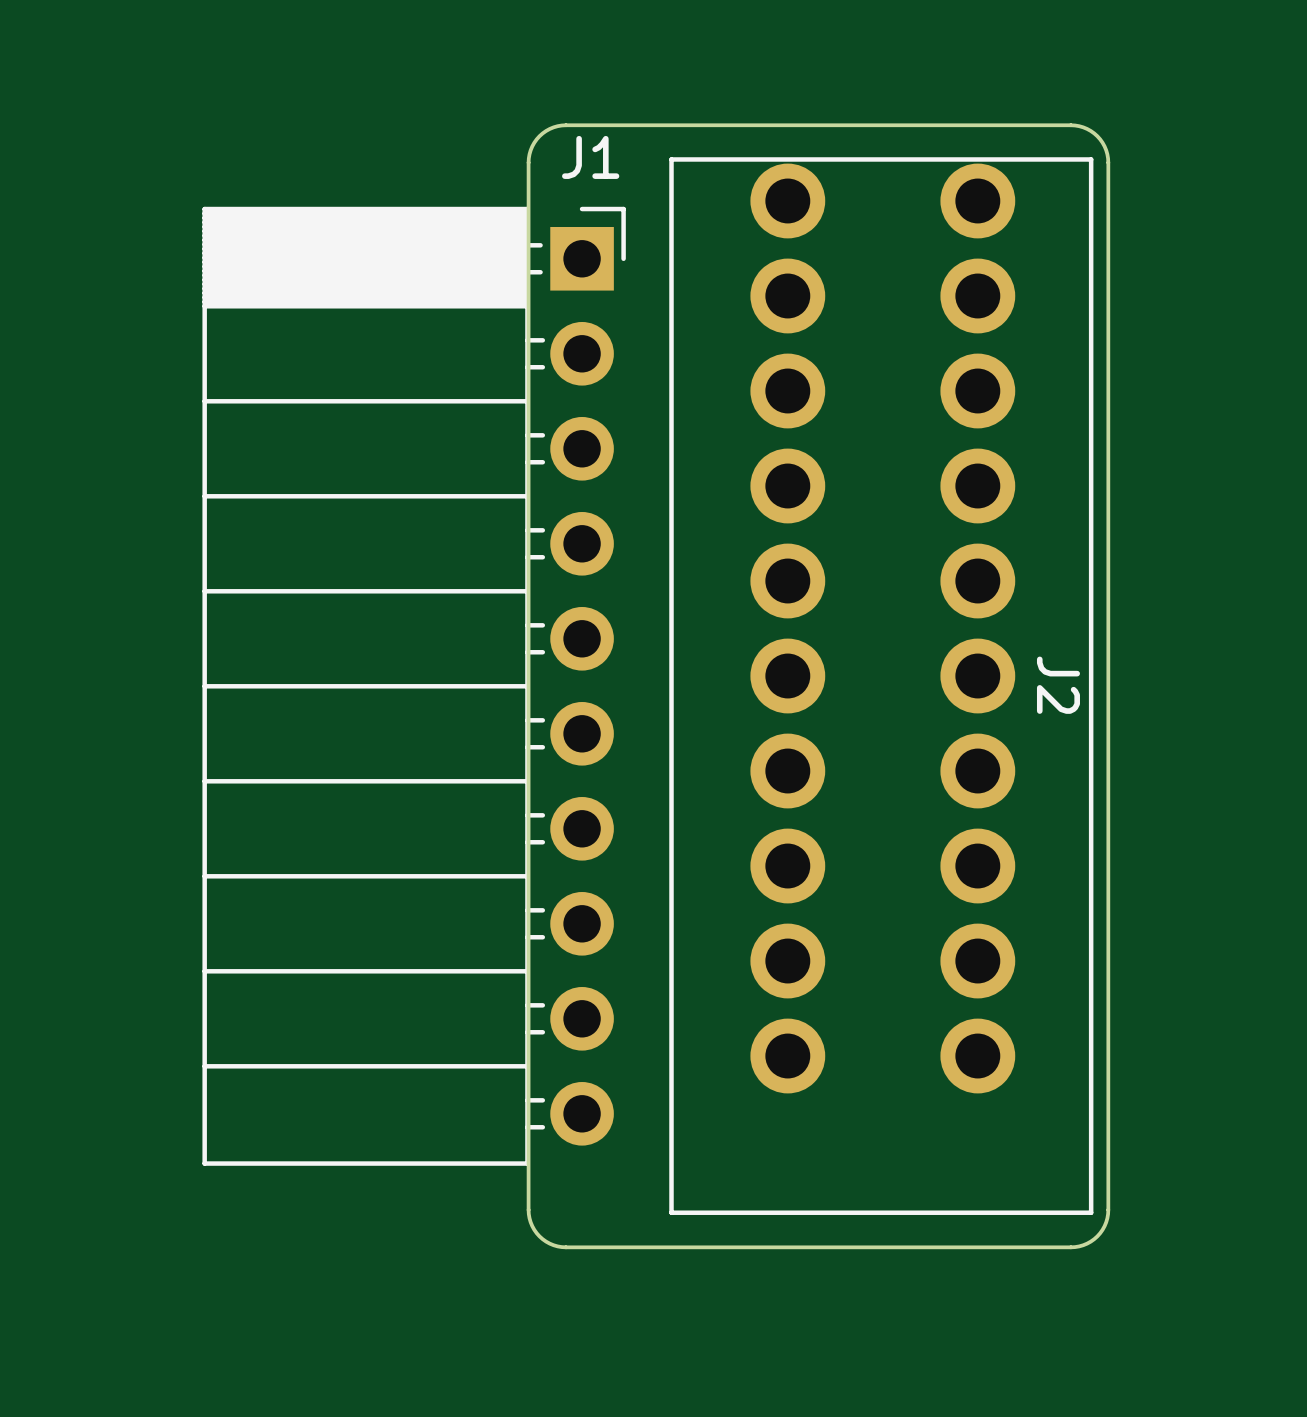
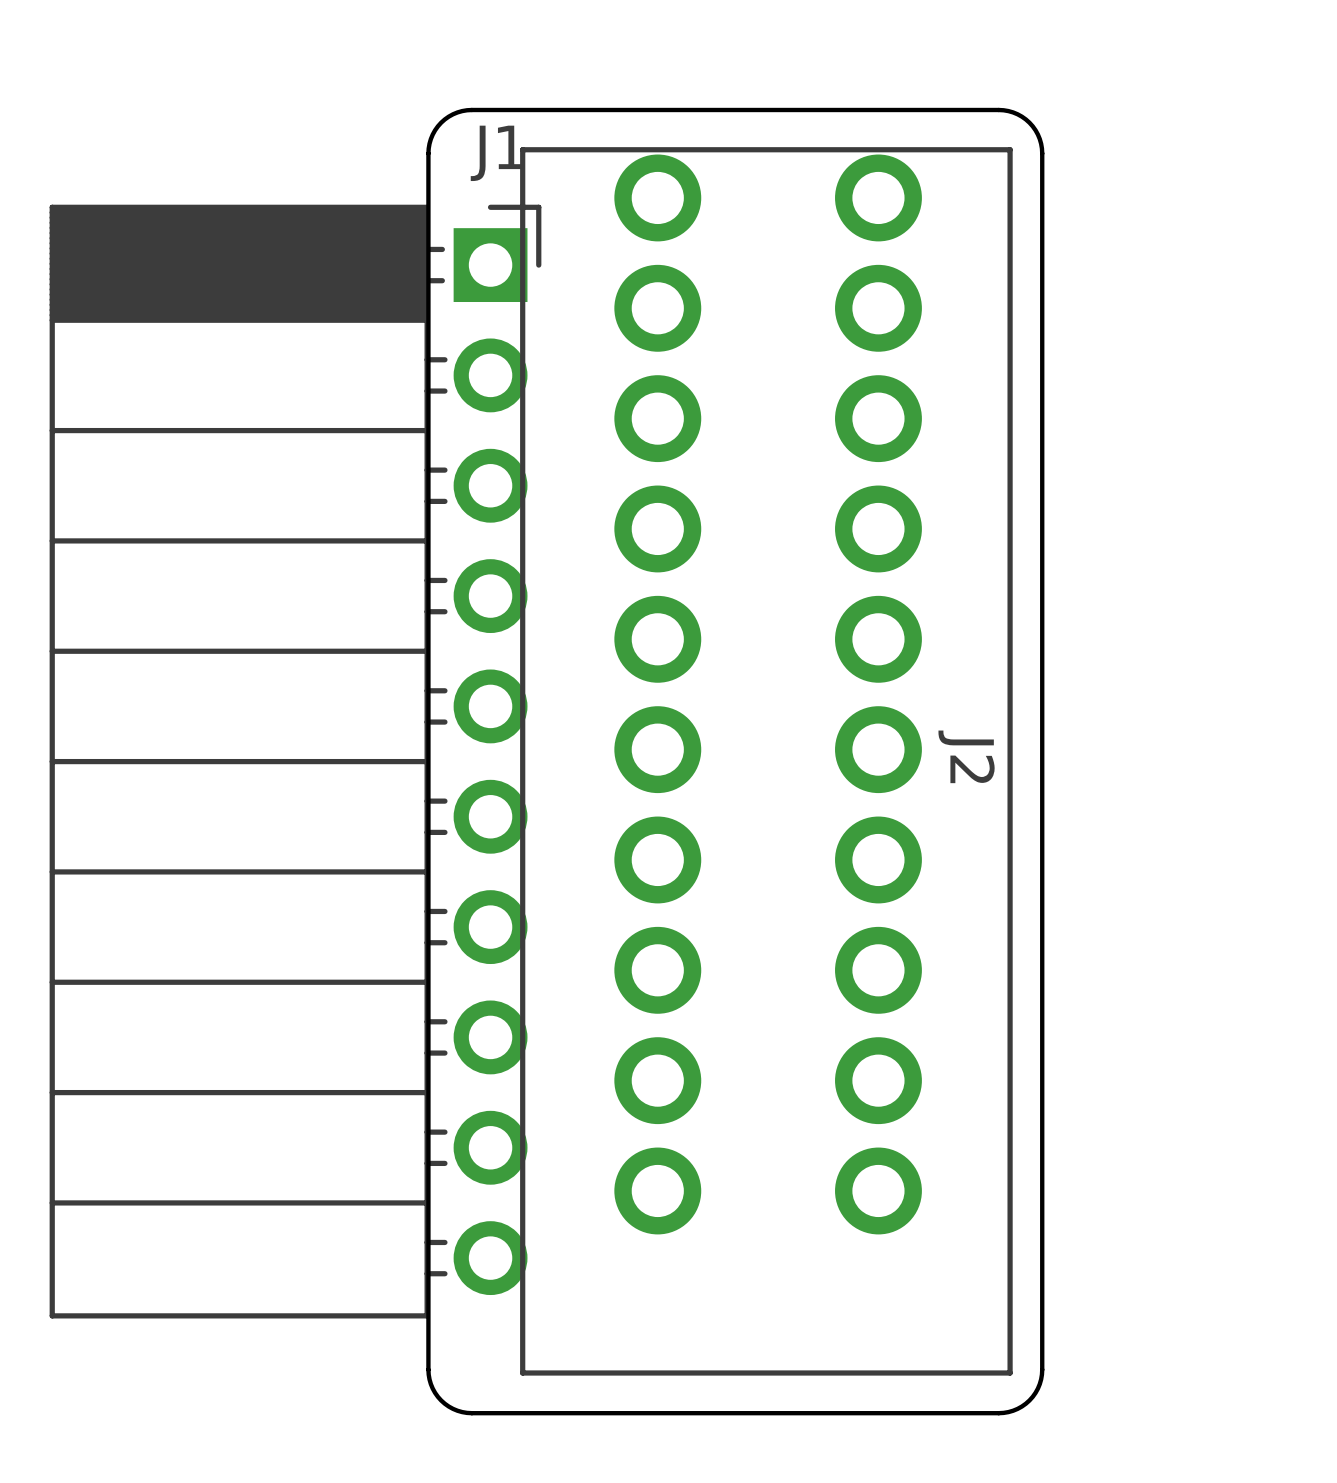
board edge: (1019, 125) (1070, 125) (1087, 128) (1102, 142) (1108, 162) (1108, 1214) (1100, 1233) (1083, 1245) (1070, 1247) (1019, 1247) -> (998, 109) (1013, 112) (1029, 122) (1037, 134) (1042, 153) (1042, 1369) (1037, 1388) (1029, 1400) (1013, 1410) (998, 1413)
J2 position: (881, 686) -> (766, 761)

